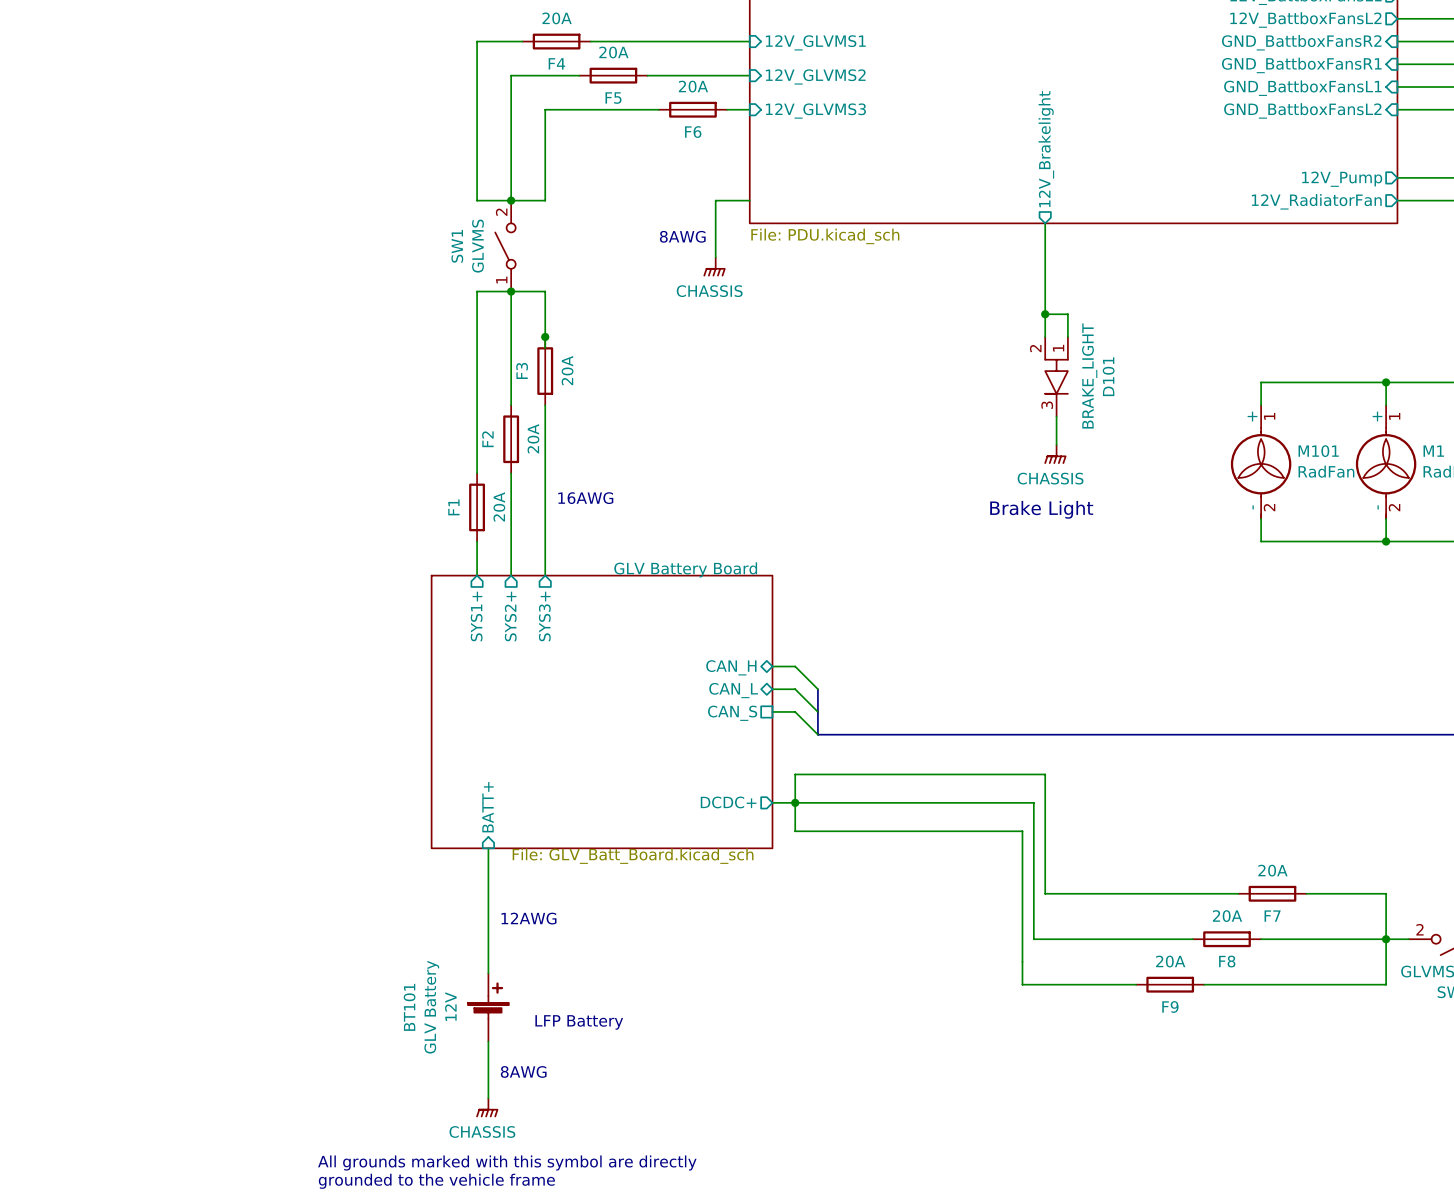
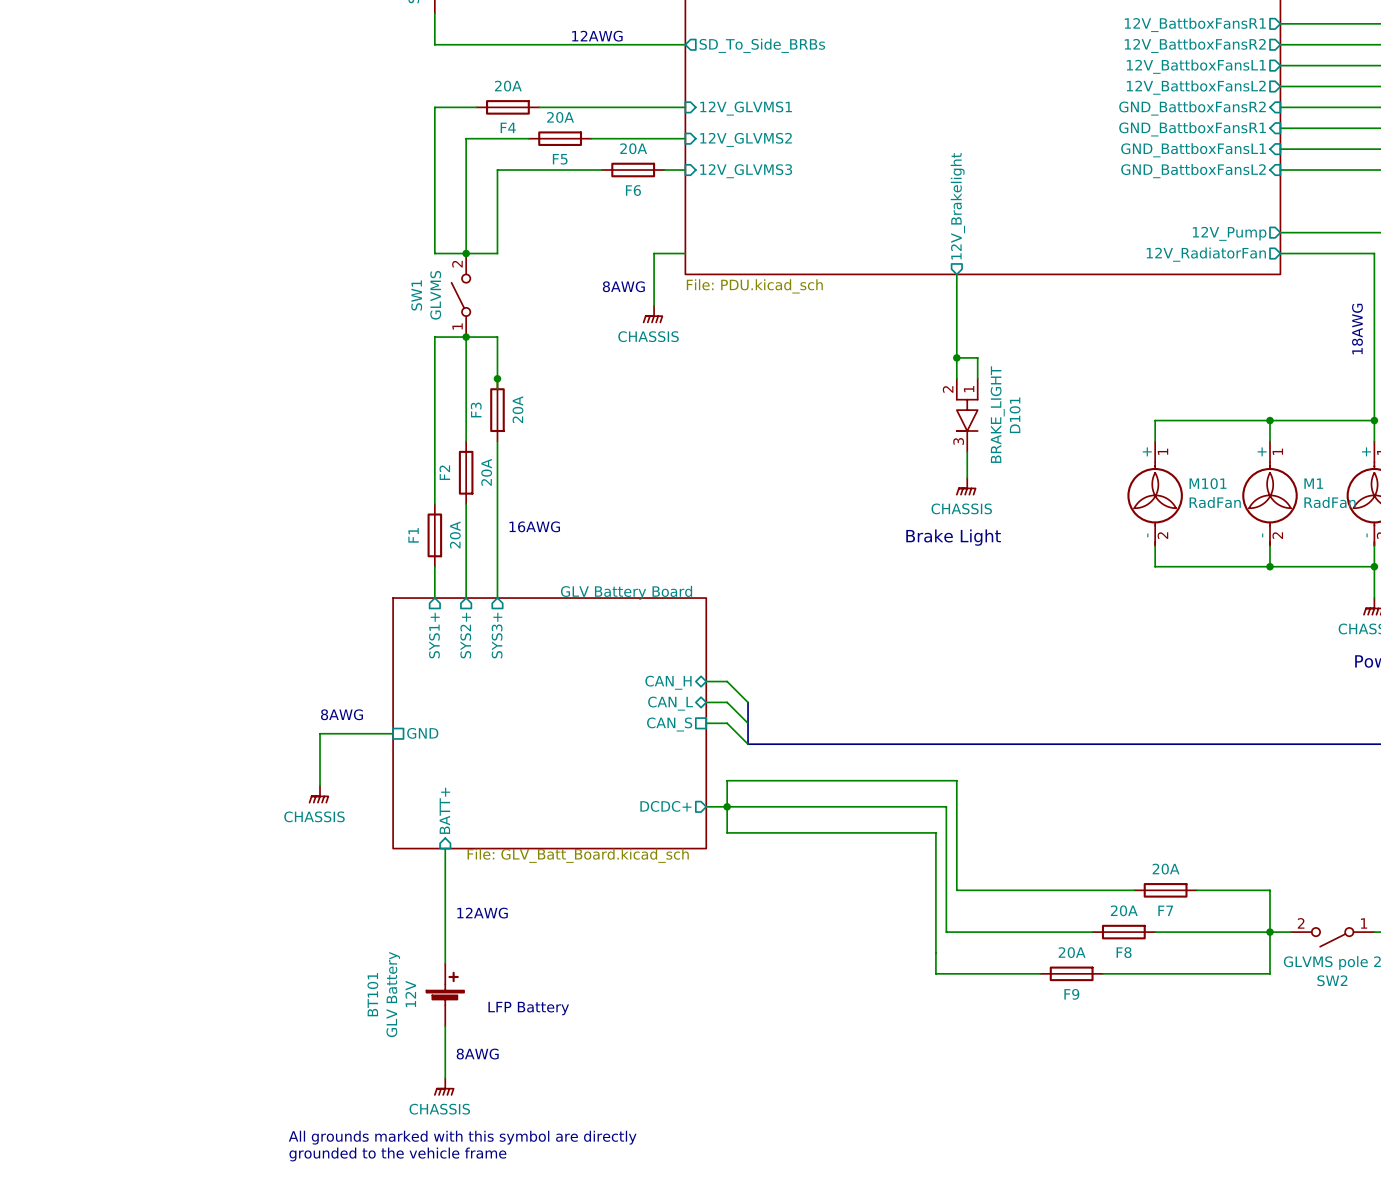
text: none -> 8AWG (341, 714)
sheet pin: none -> GND (422, 733)
wire: none -> (393, 733) (320, 733) (320, 785)
part: none -> CHASSIS (318, 794)

